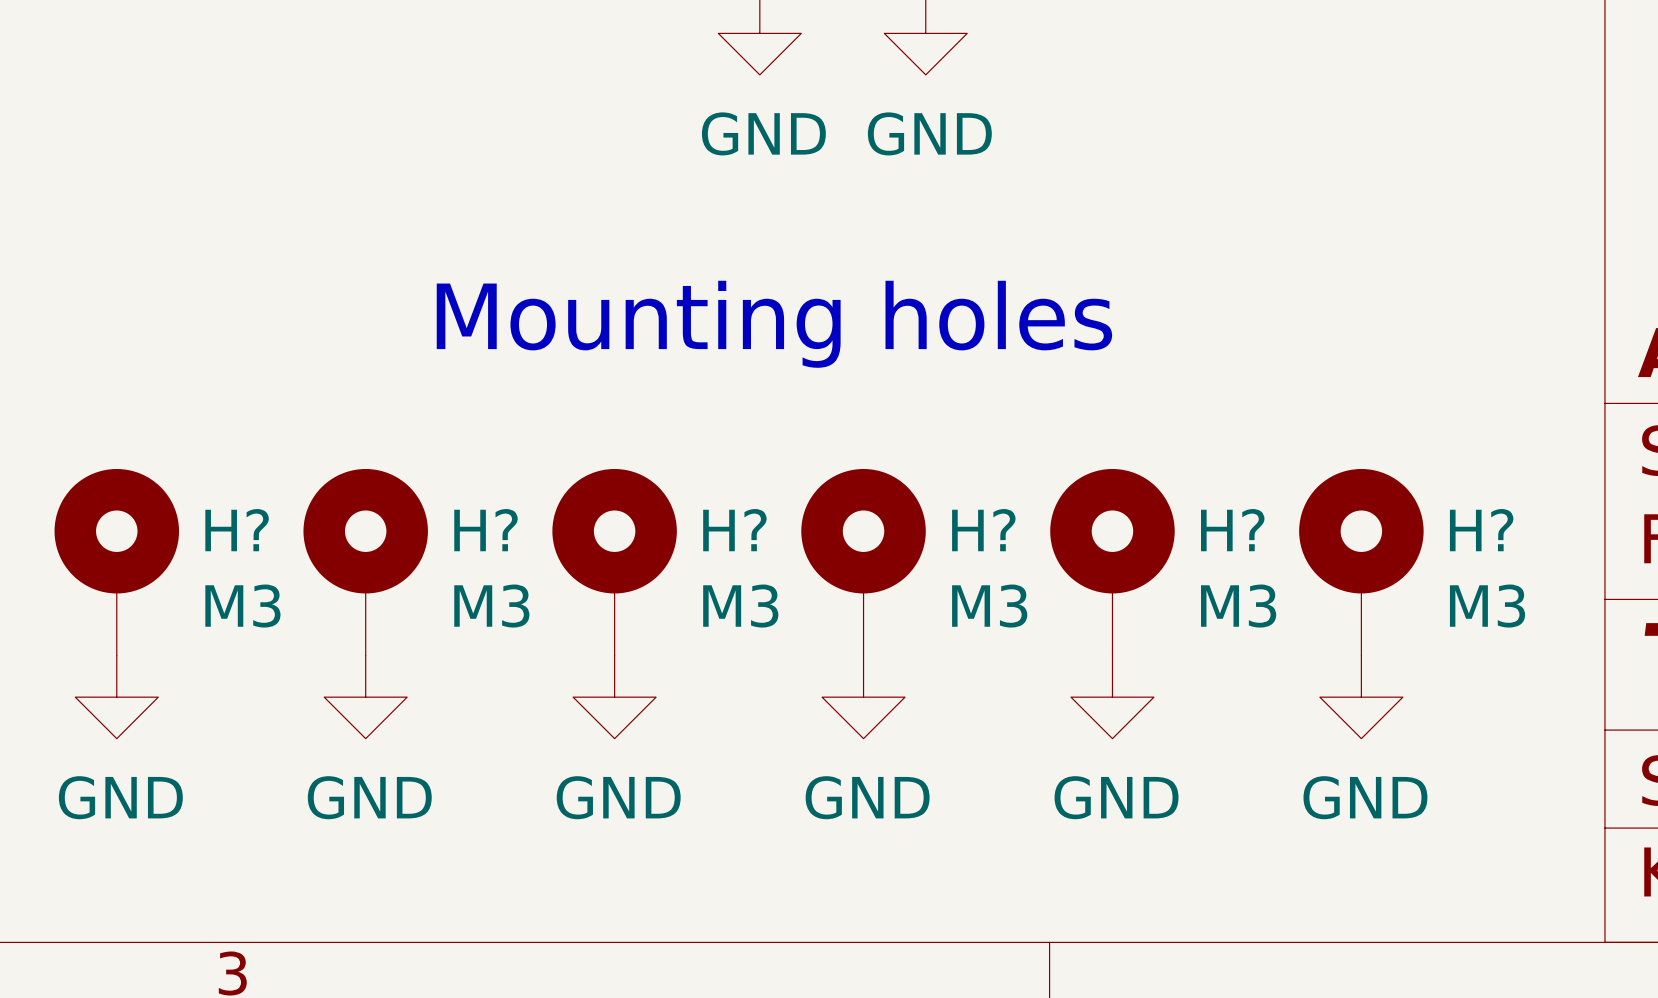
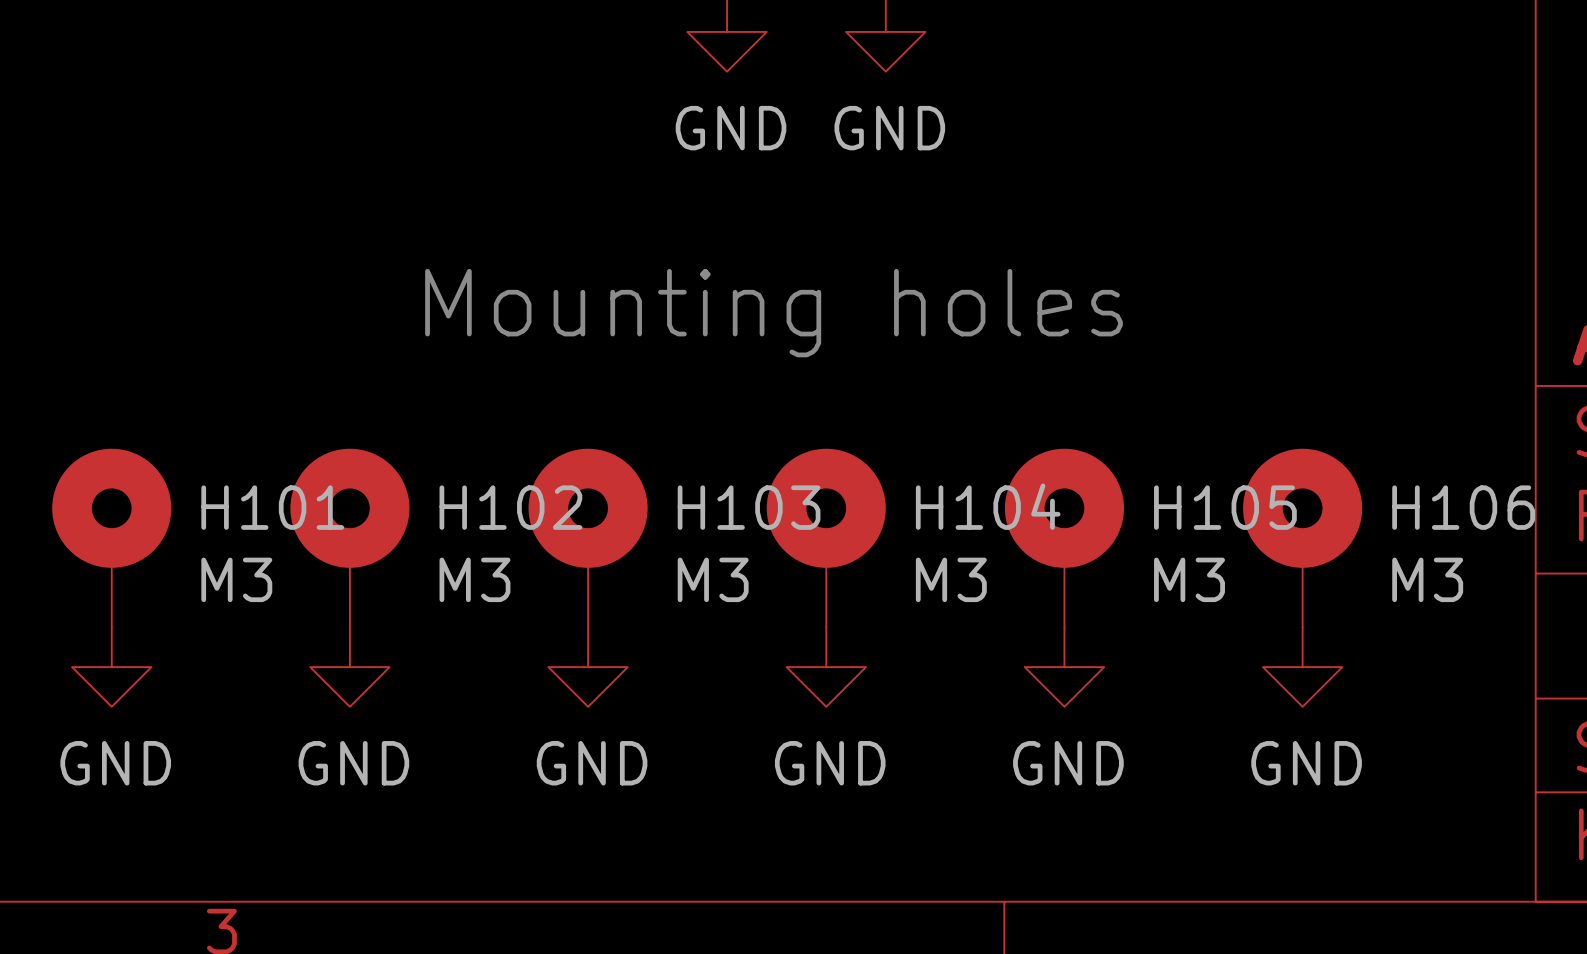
H? name: H? (237, 530) -> H101 (272, 507)
H? name: H? (485, 530) -> H102 (510, 507)
H? name: H? (734, 530) -> H103 (749, 507)
H? name: H? (983, 530) -> H104 (988, 506)
H? name: H? (1232, 530) -> H105 (1225, 507)
H? name: H? (1481, 530) -> H106 (1463, 507)

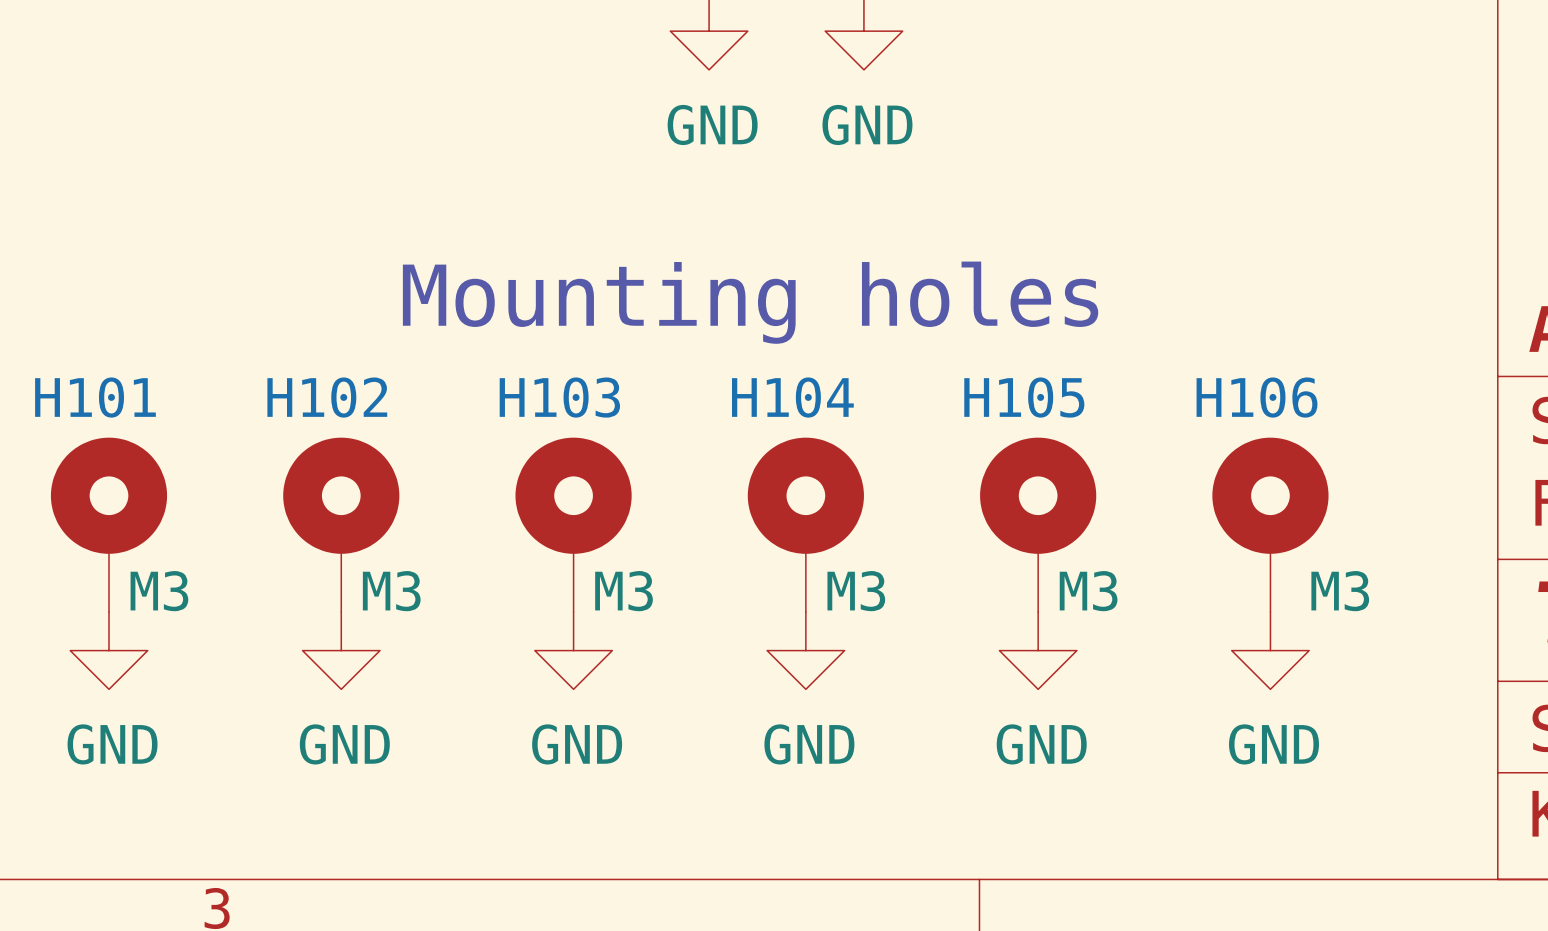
H104 name position: H104 (988, 506) -> H104 (792, 397)
H101 name position: H101 (272, 507) -> H101 (95, 397)
H102 name position: H102 (510, 507) -> H102 (327, 397)
H103 name position: H103 (749, 507) -> H103 (559, 397)
H105 name position: H105 (1225, 507) -> H105 (1024, 397)
H106 name position: H106 (1463, 507) -> H106 (1257, 397)
H101 value position: M3 (236, 579) -> M3 (159, 591)
H102 value position: M3 (474, 579) -> M3 (391, 591)
H103 value position: M3 (713, 579) -> M3 (624, 591)
H104 value position: M3 (951, 579) -> M3 (856, 591)
H105 value position: M3 (1189, 579) -> M3 (1088, 591)
H106 value position: M3 (1427, 579) -> M3 (1340, 591)

